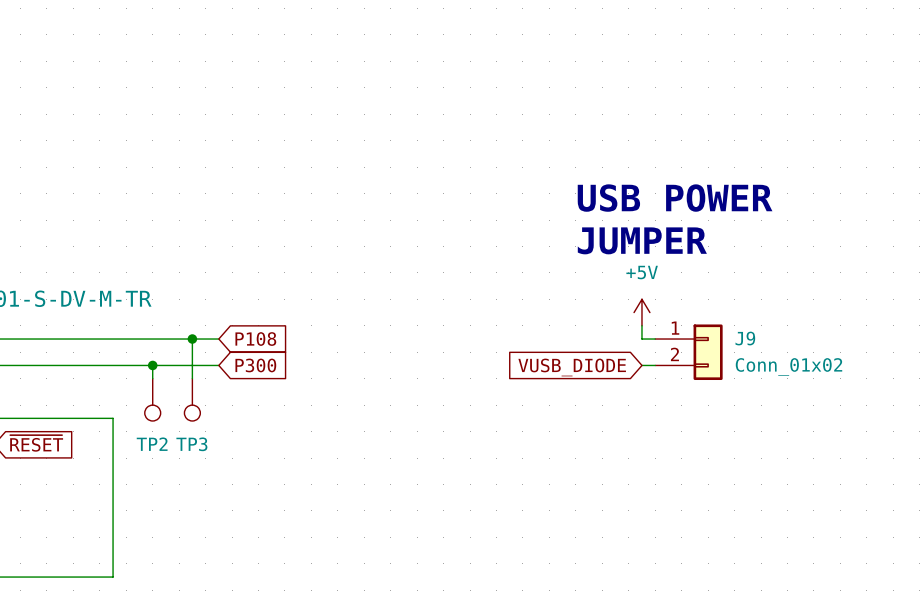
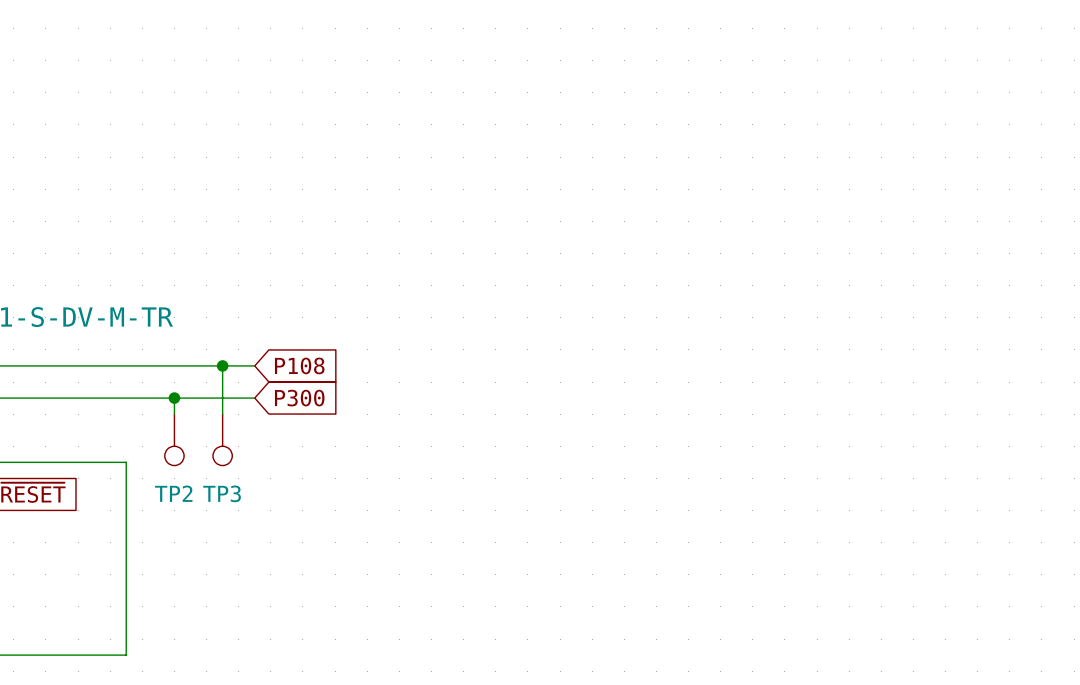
text: USB POWER (675, 198) -> none
text: JUMPER (642, 240) -> none
power symbol: +5V (641, 312) -> none
wire: (641, 325) (641, 339) (655, 339) -> none
J9: Conn_01x02 (688, 352) -> none
wire: (641, 365) (655, 365) -> none
global label: VUSB_DIODE (572, 367) -> none

